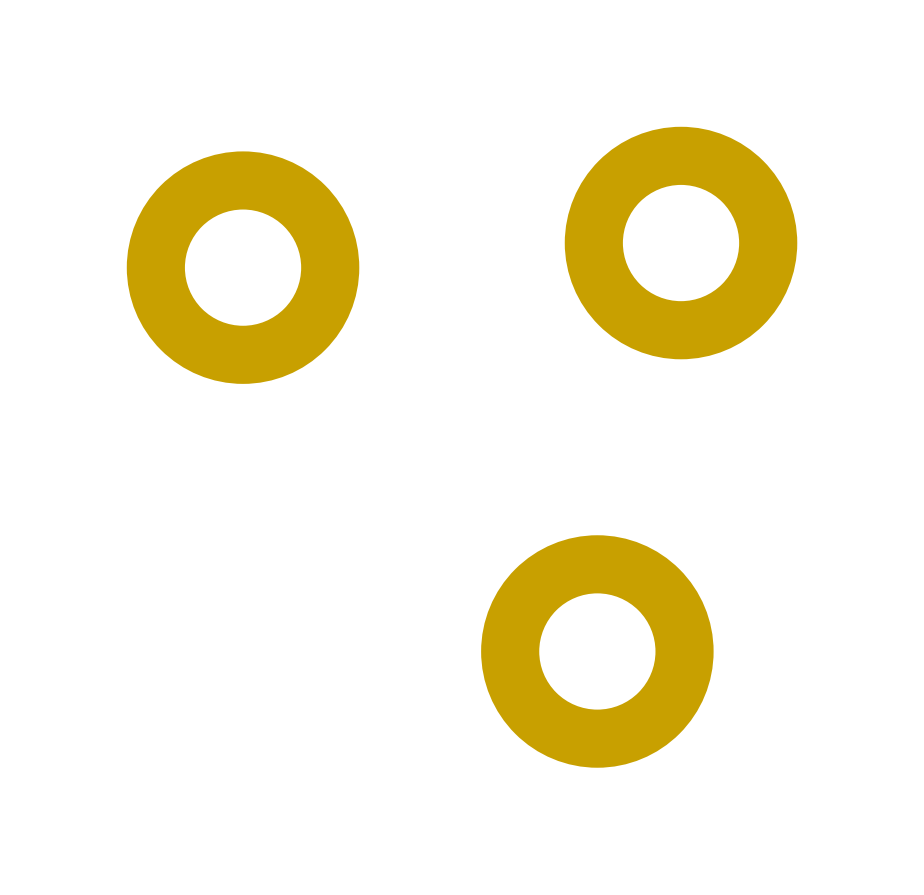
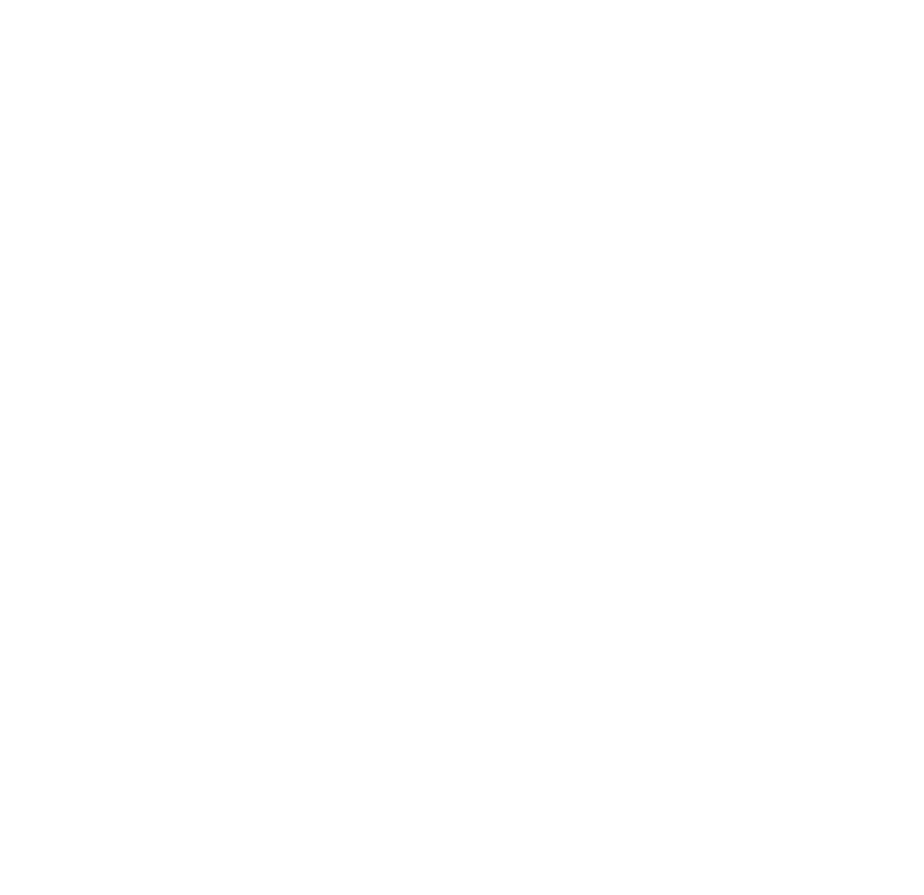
part: (681, 243) -> none
part: (243, 267) -> none
part: (597, 651) -> none

